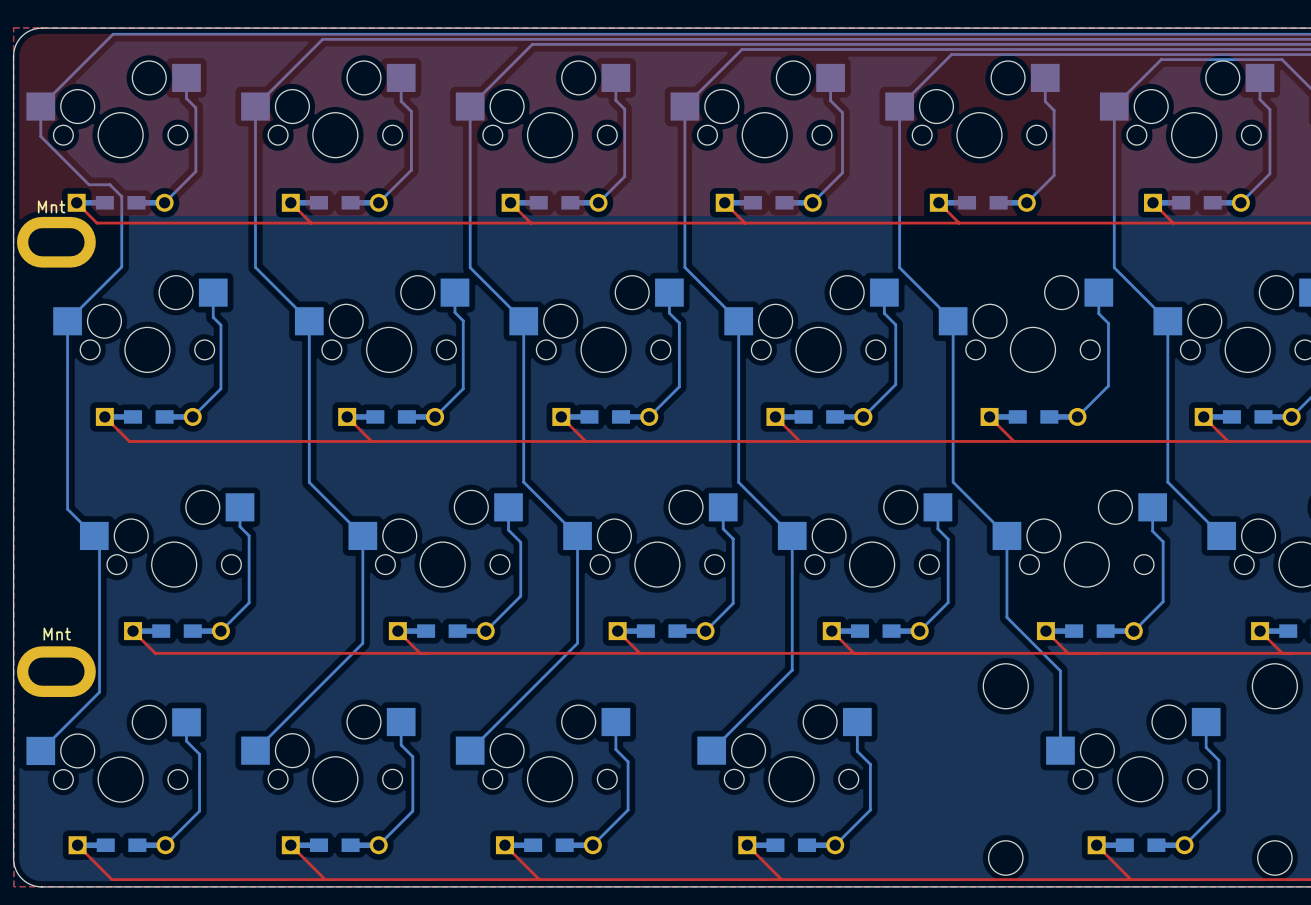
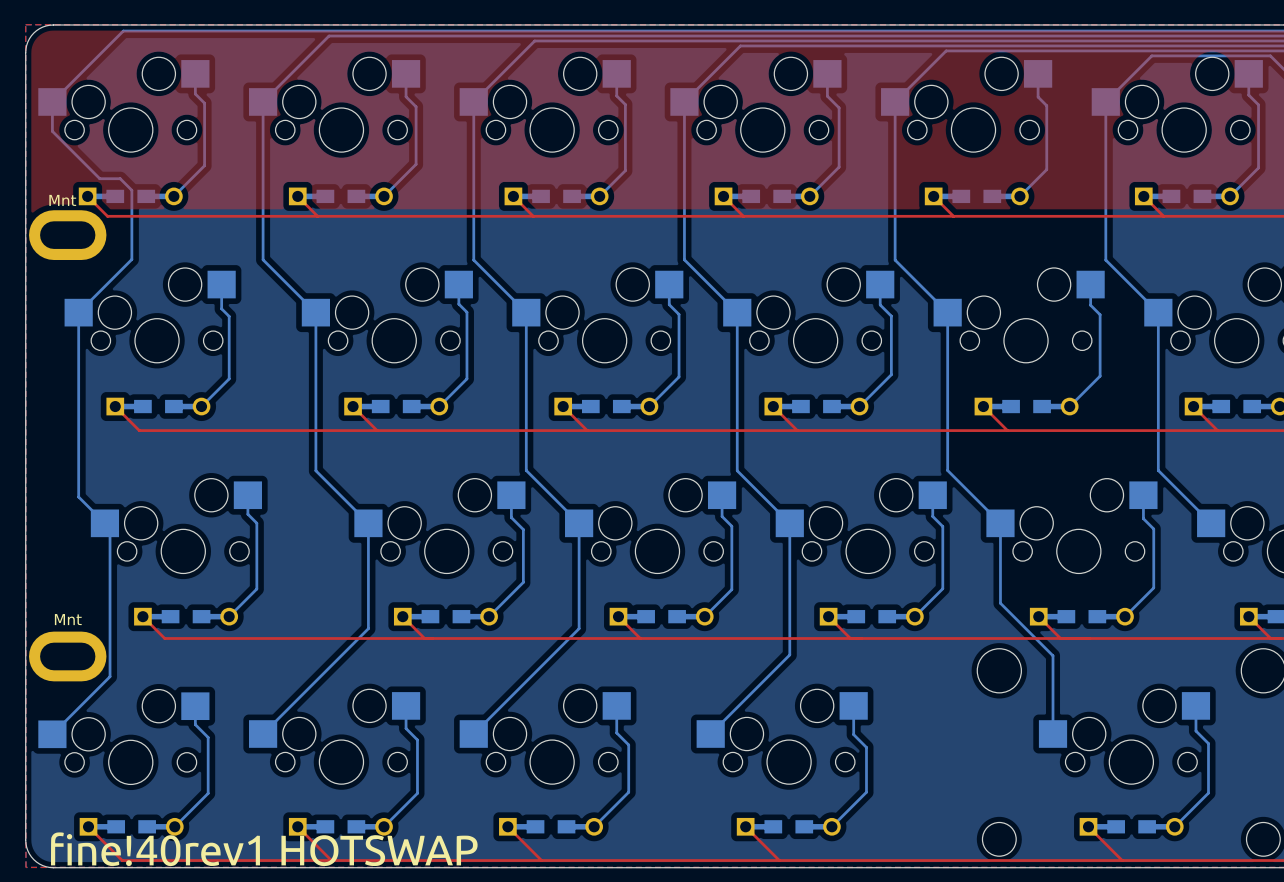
drawing: none -> [50, 832, 478, 867]

